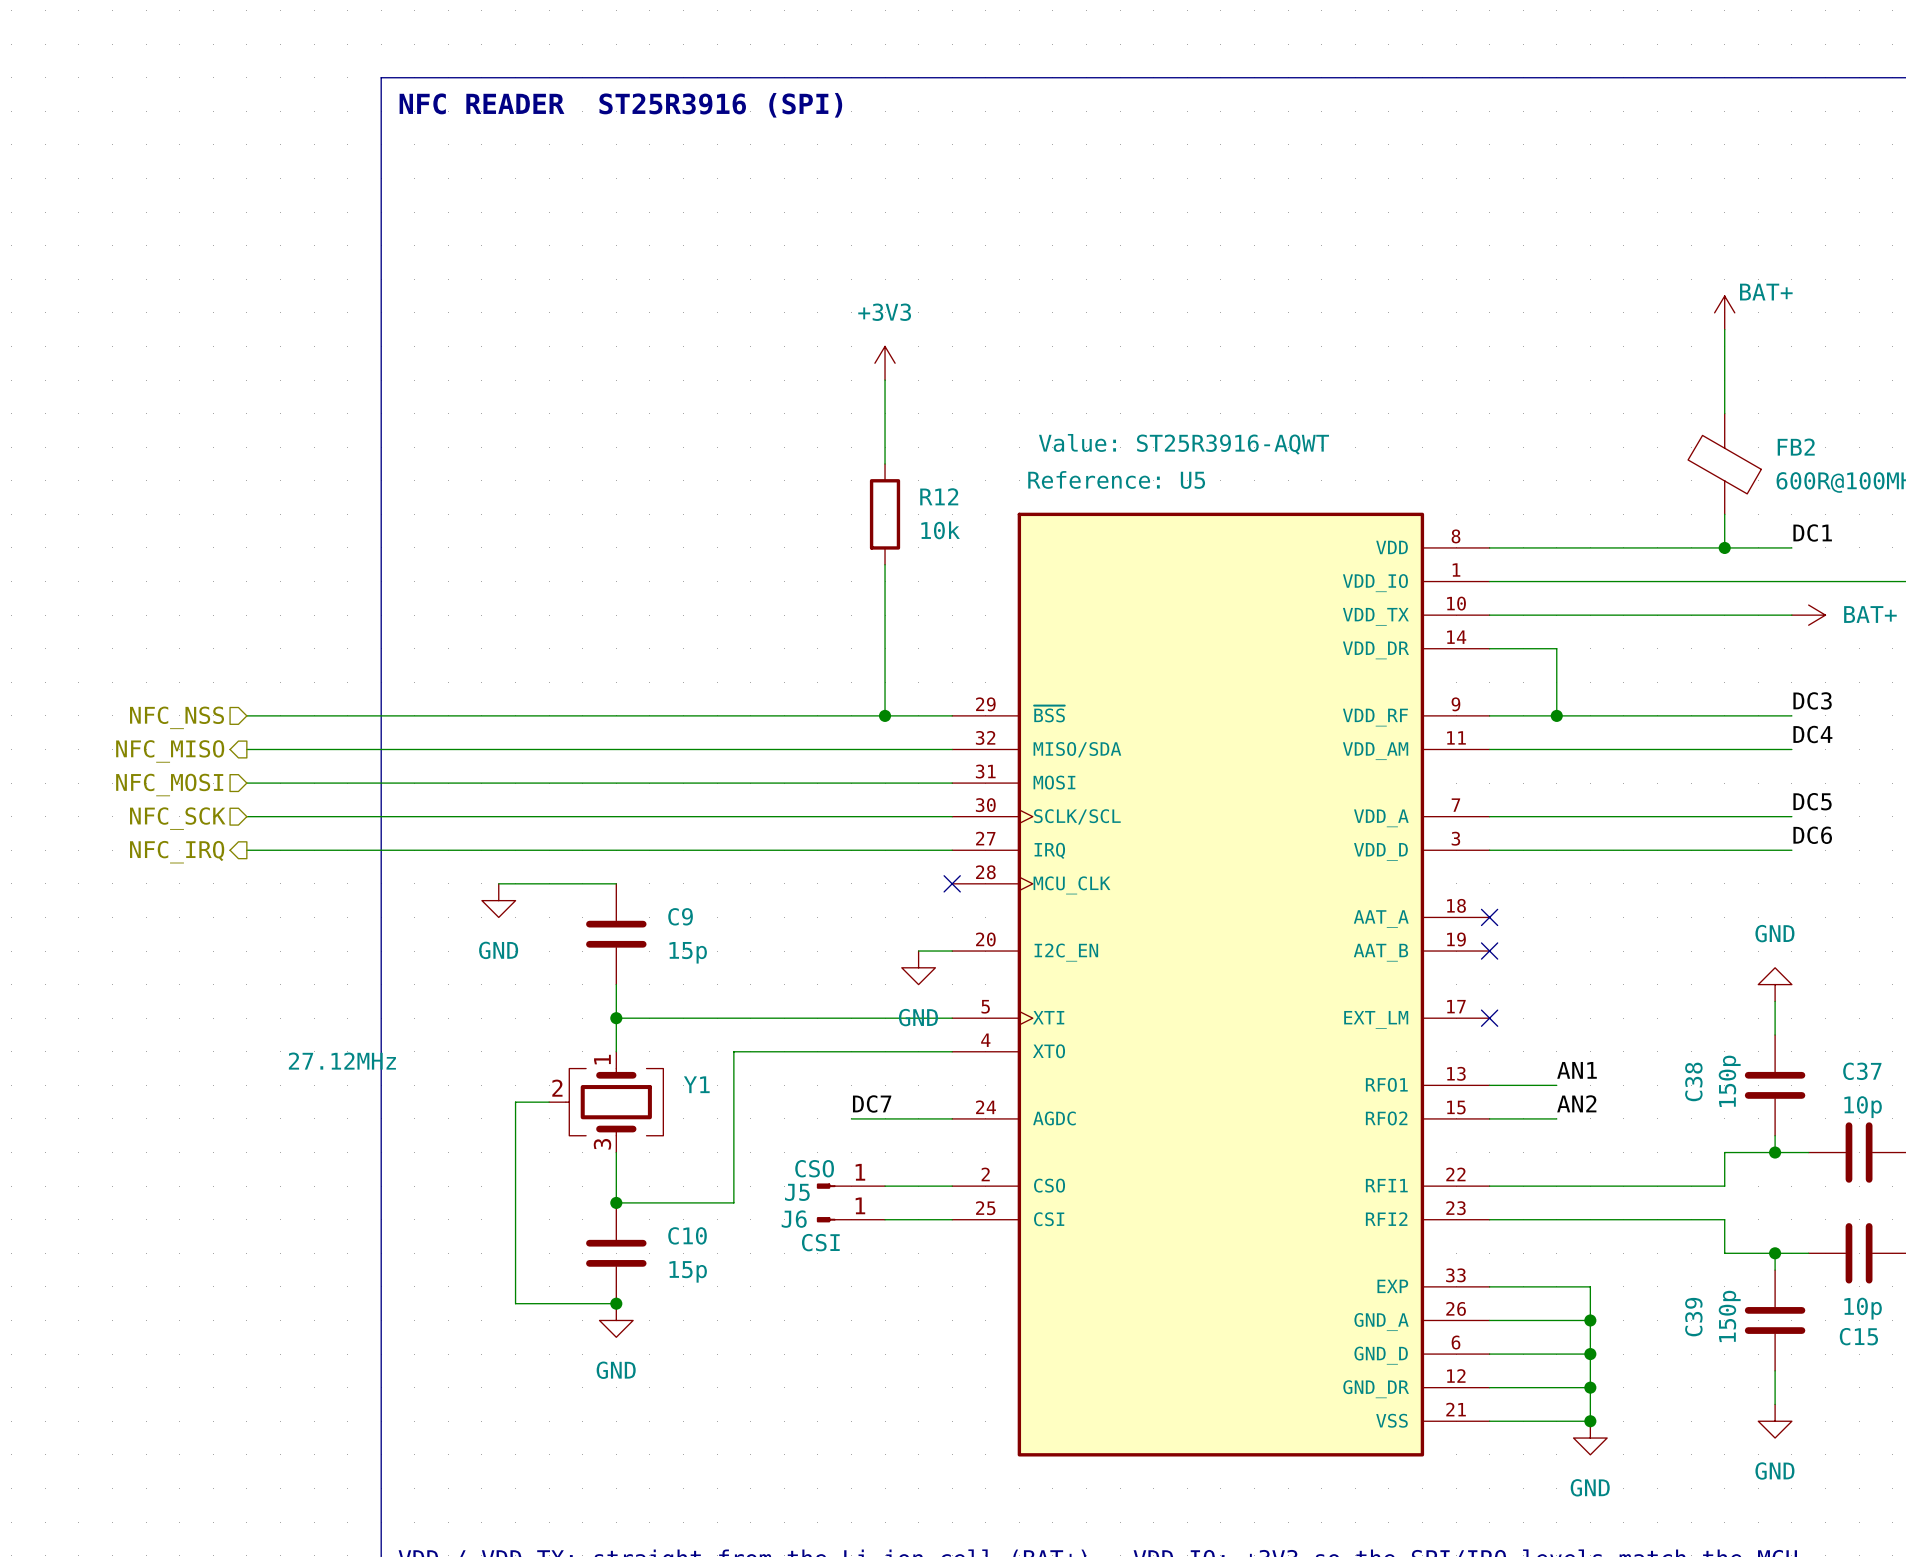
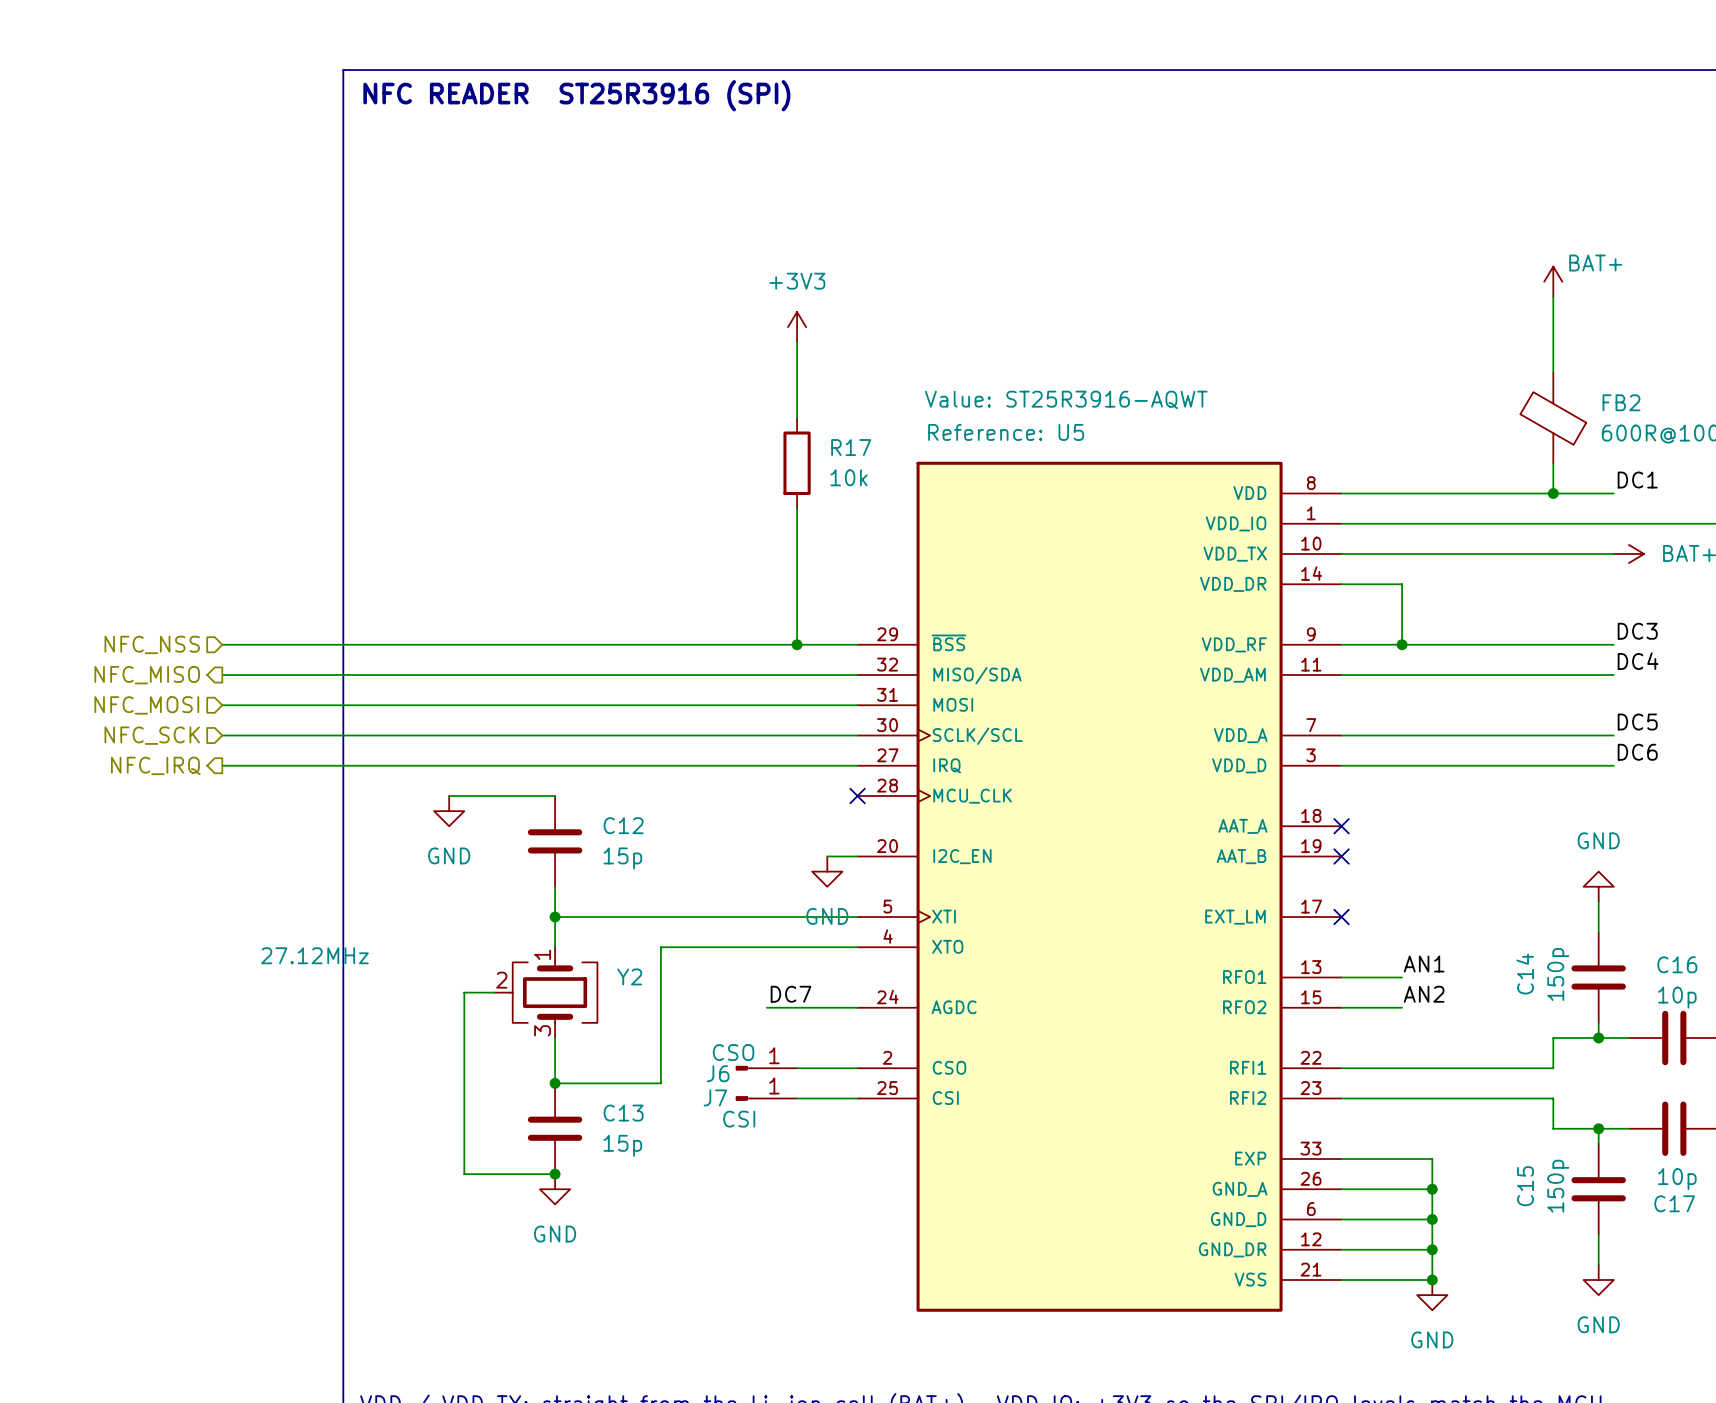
R12 name: R12 (939, 496) -> R17 (851, 447)
C9 name: C9 (680, 916) -> C12 (623, 825)
C37 name: C37 (1862, 1071) -> C16 (1677, 964)
C38 name: C38 (1693, 1081) -> C14 (1525, 974)
Y1 name: Y1 (696, 1084) -> Y2 (629, 976)
J5 name: J5 (797, 1192) -> J6 (718, 1073)
J6 name: J6 (794, 1219) -> J7 (715, 1097)
C10 name: C10 (687, 1235) -> C13 (623, 1113)
C39 name: C39 (1693, 1317) -> C15 (1525, 1186)
C15 name: C15 (1858, 1336) -> C17 (1674, 1203)

